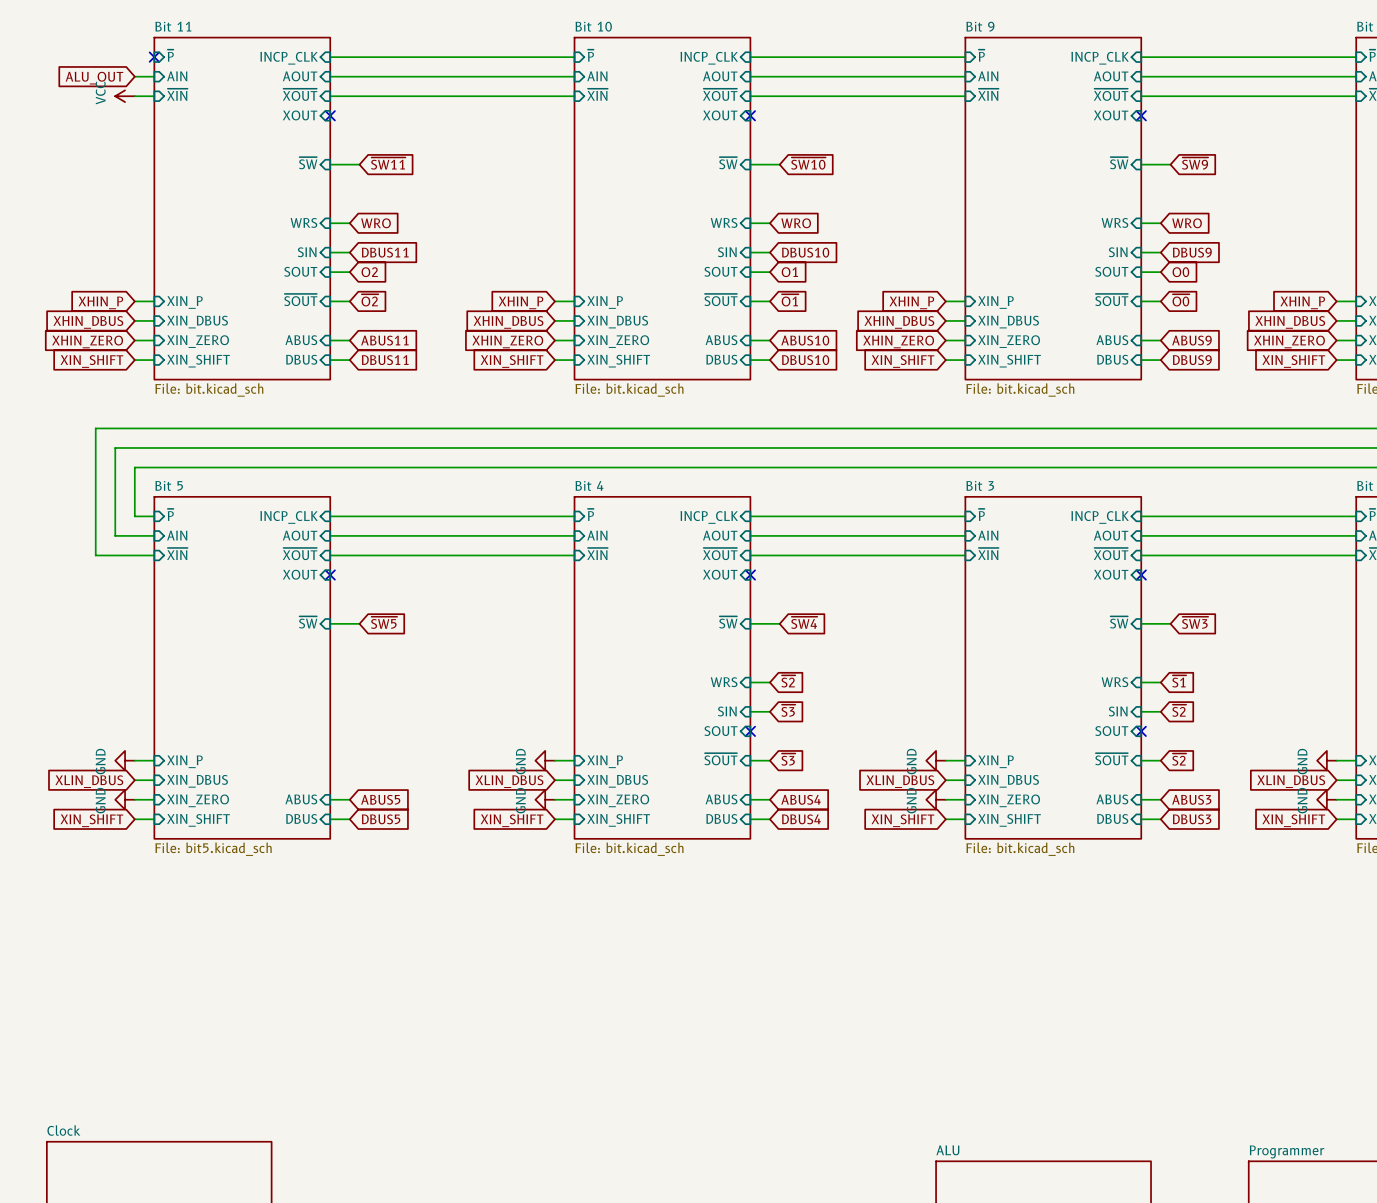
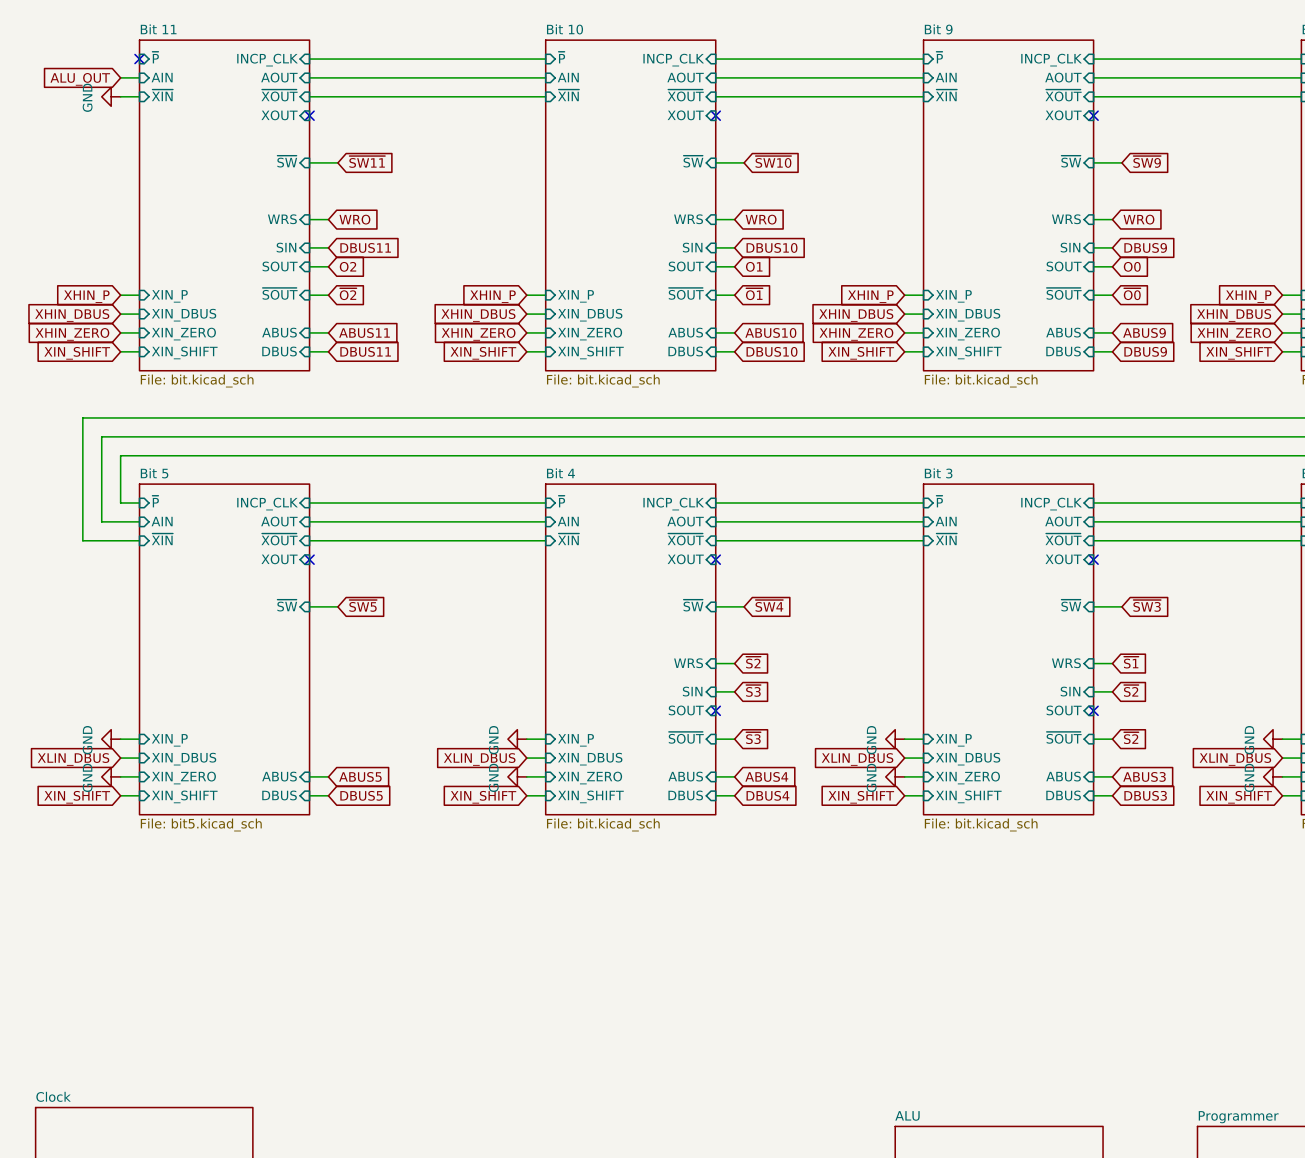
power symbol: VCC (125, 96) -> GND (111, 96)

